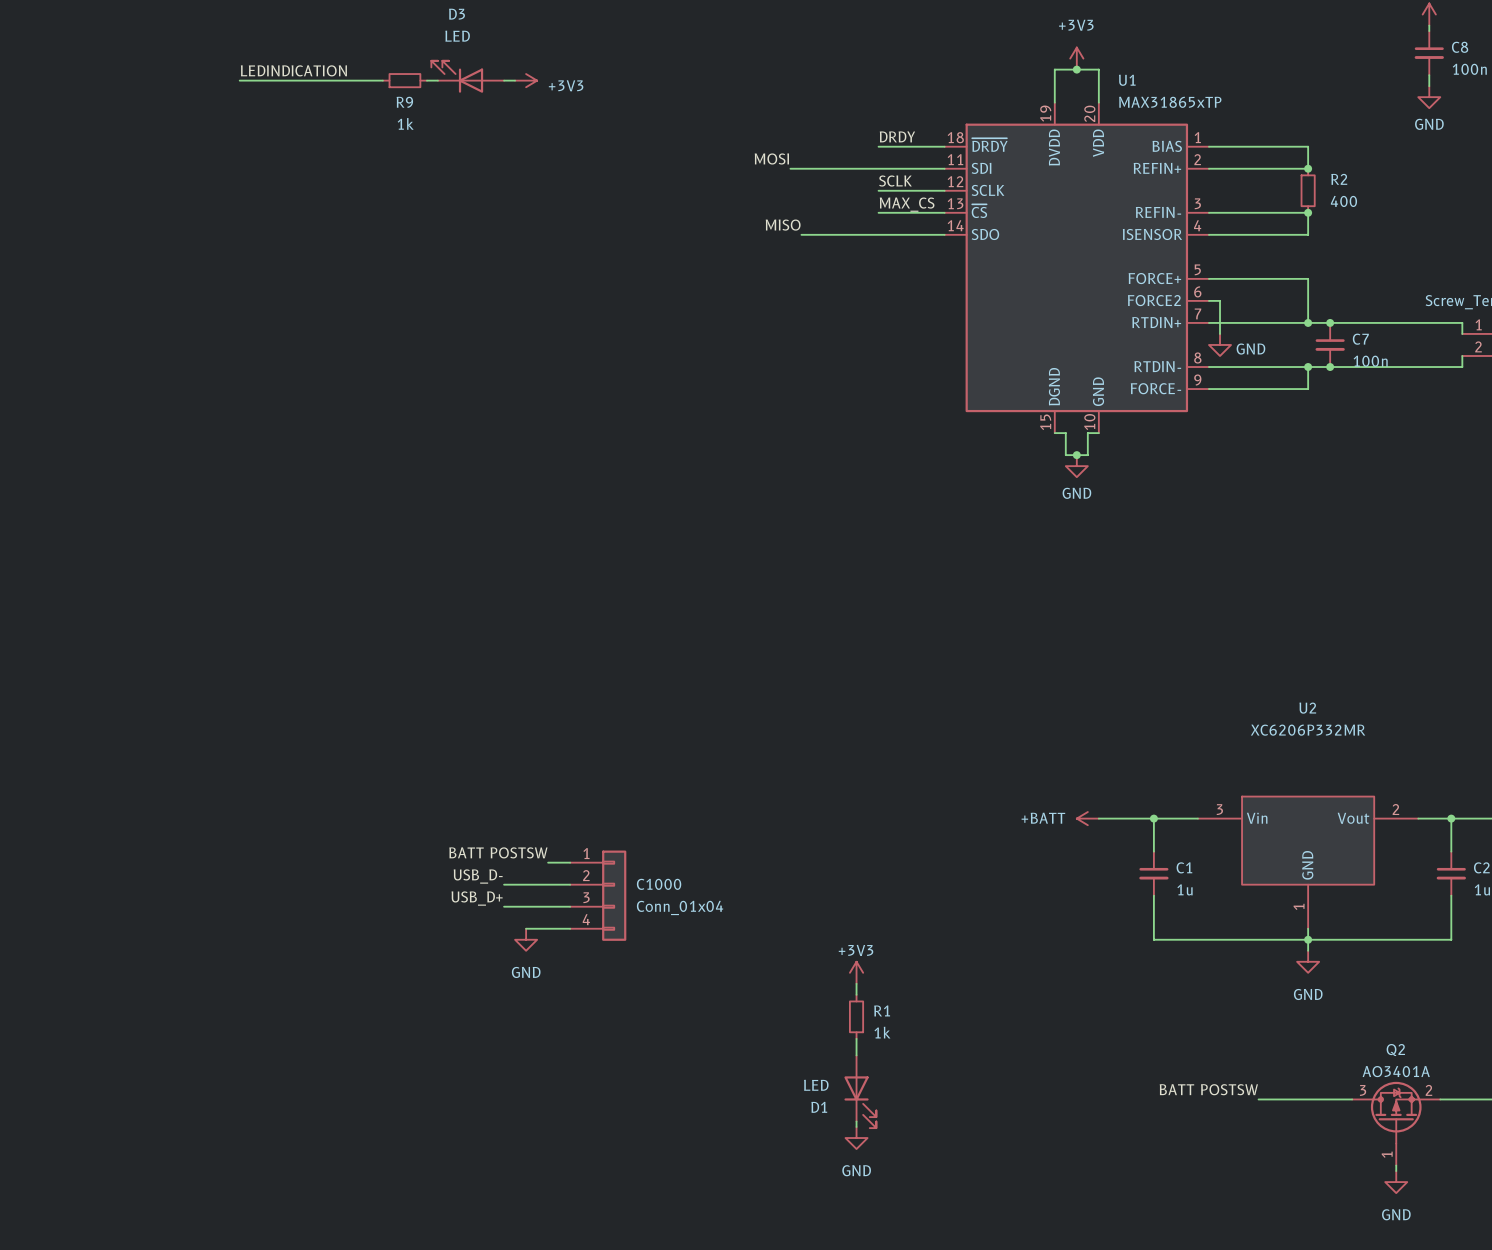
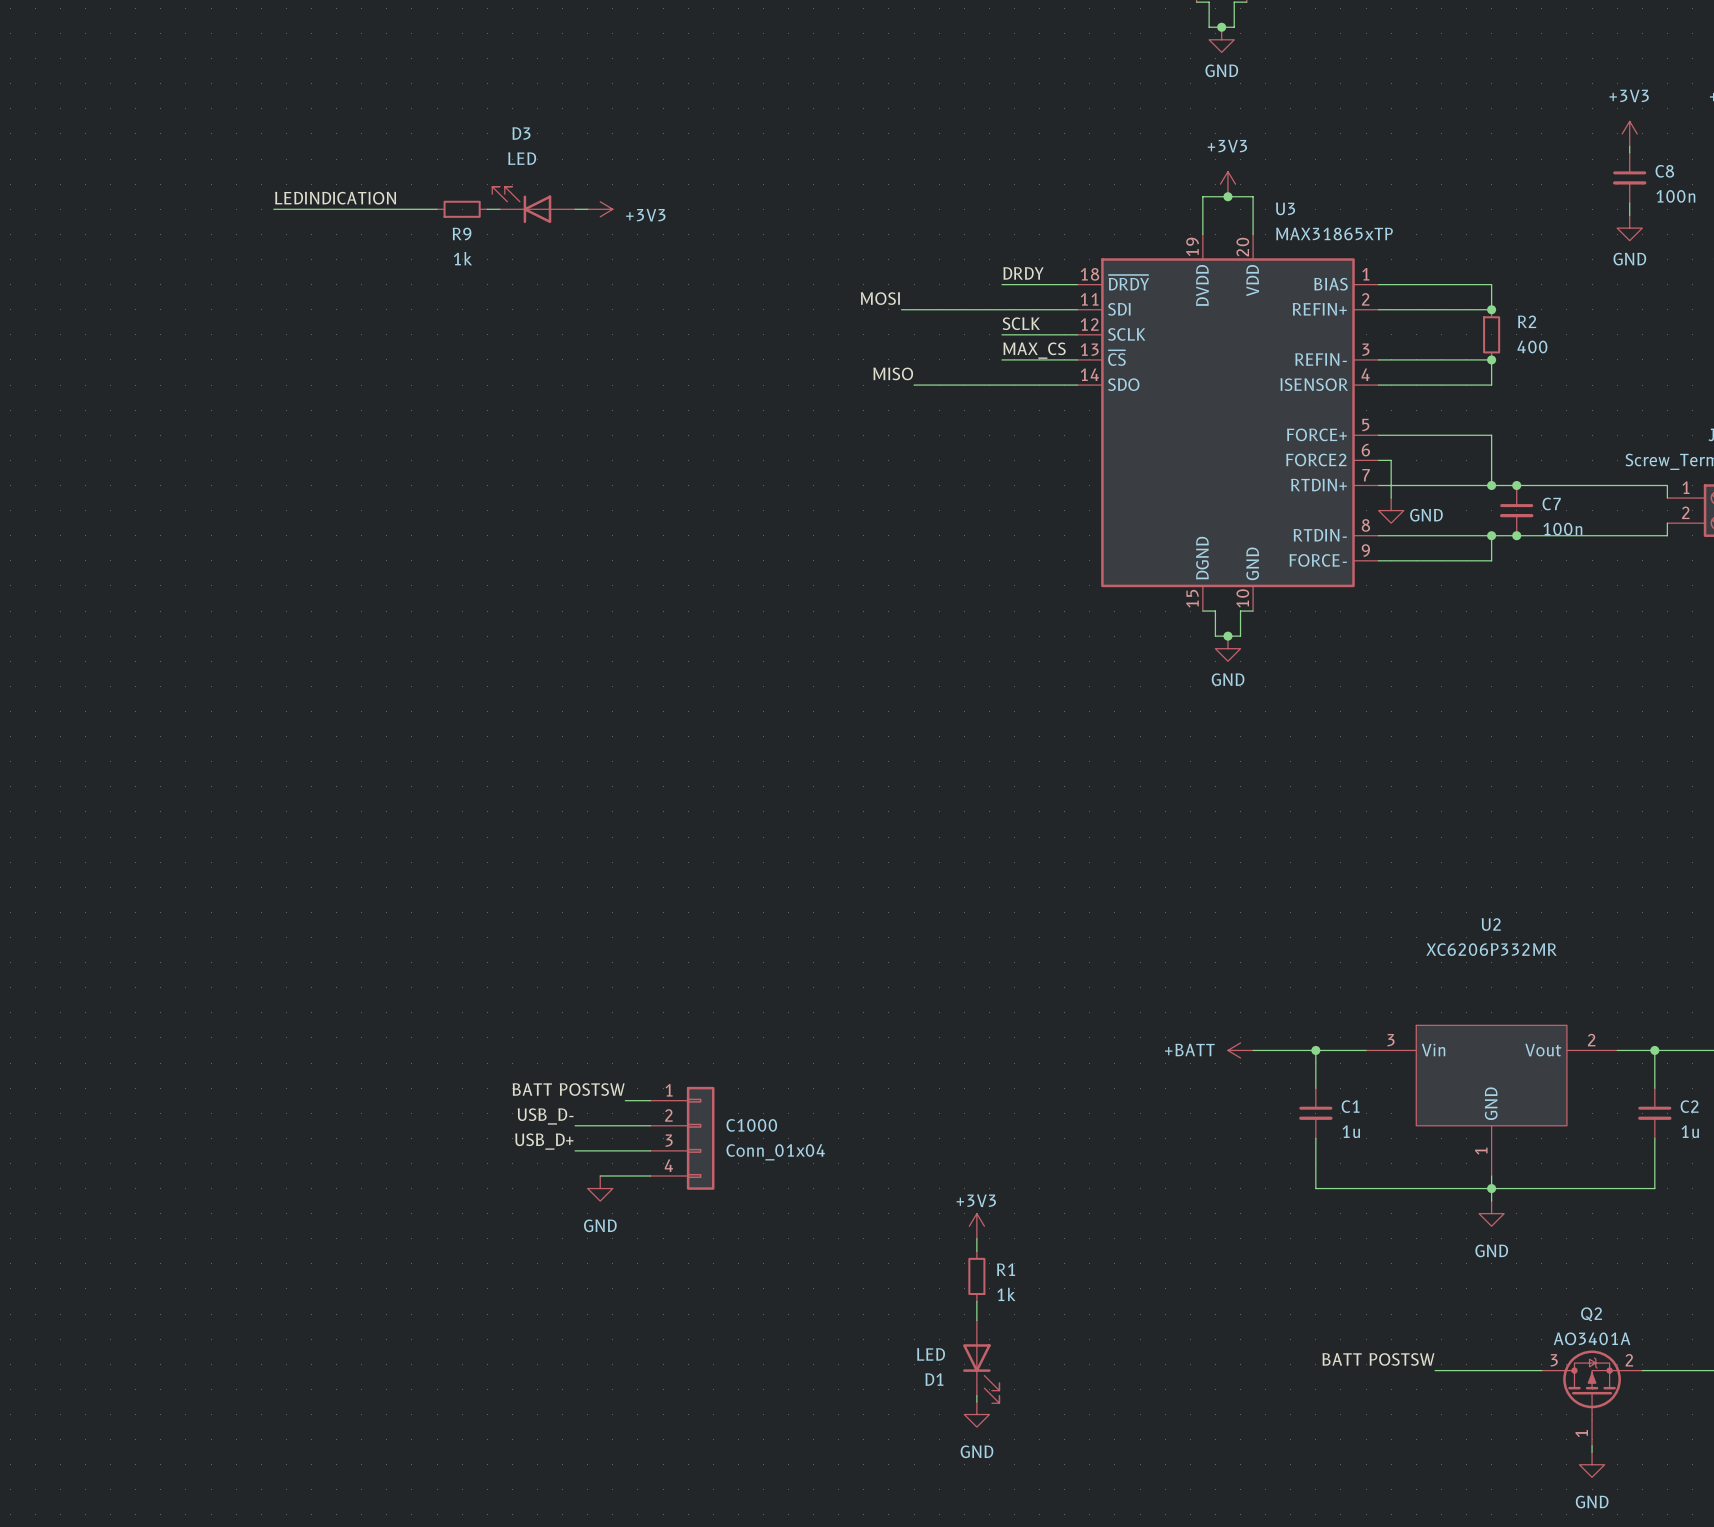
U1 name: U1 (1127, 80) -> U3 (1285, 208)

